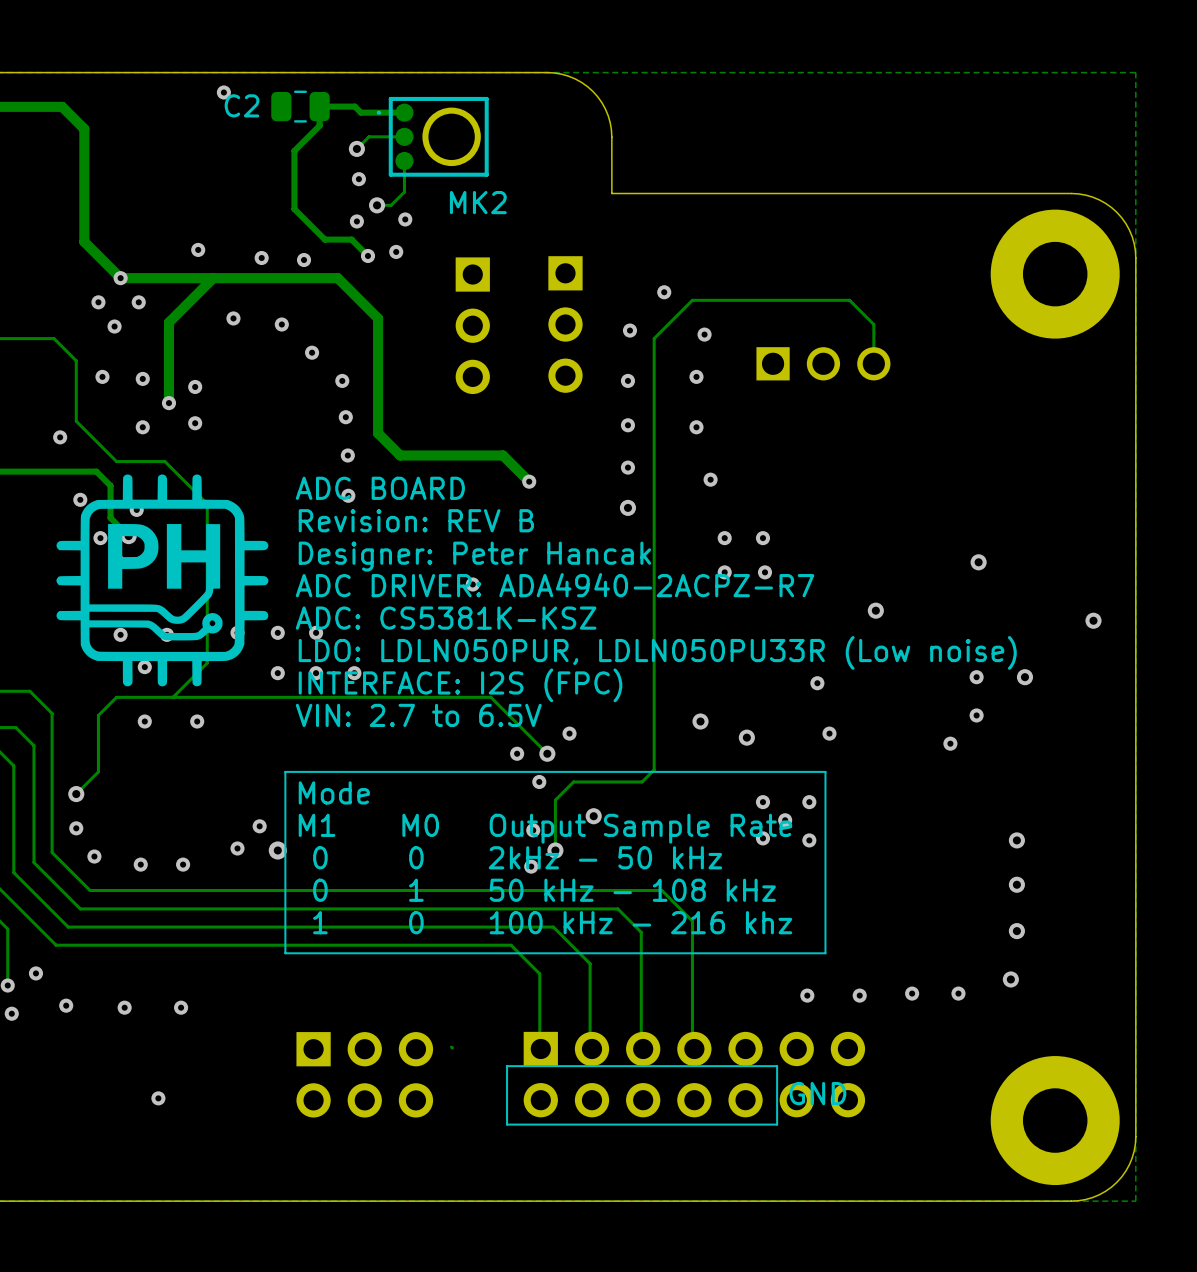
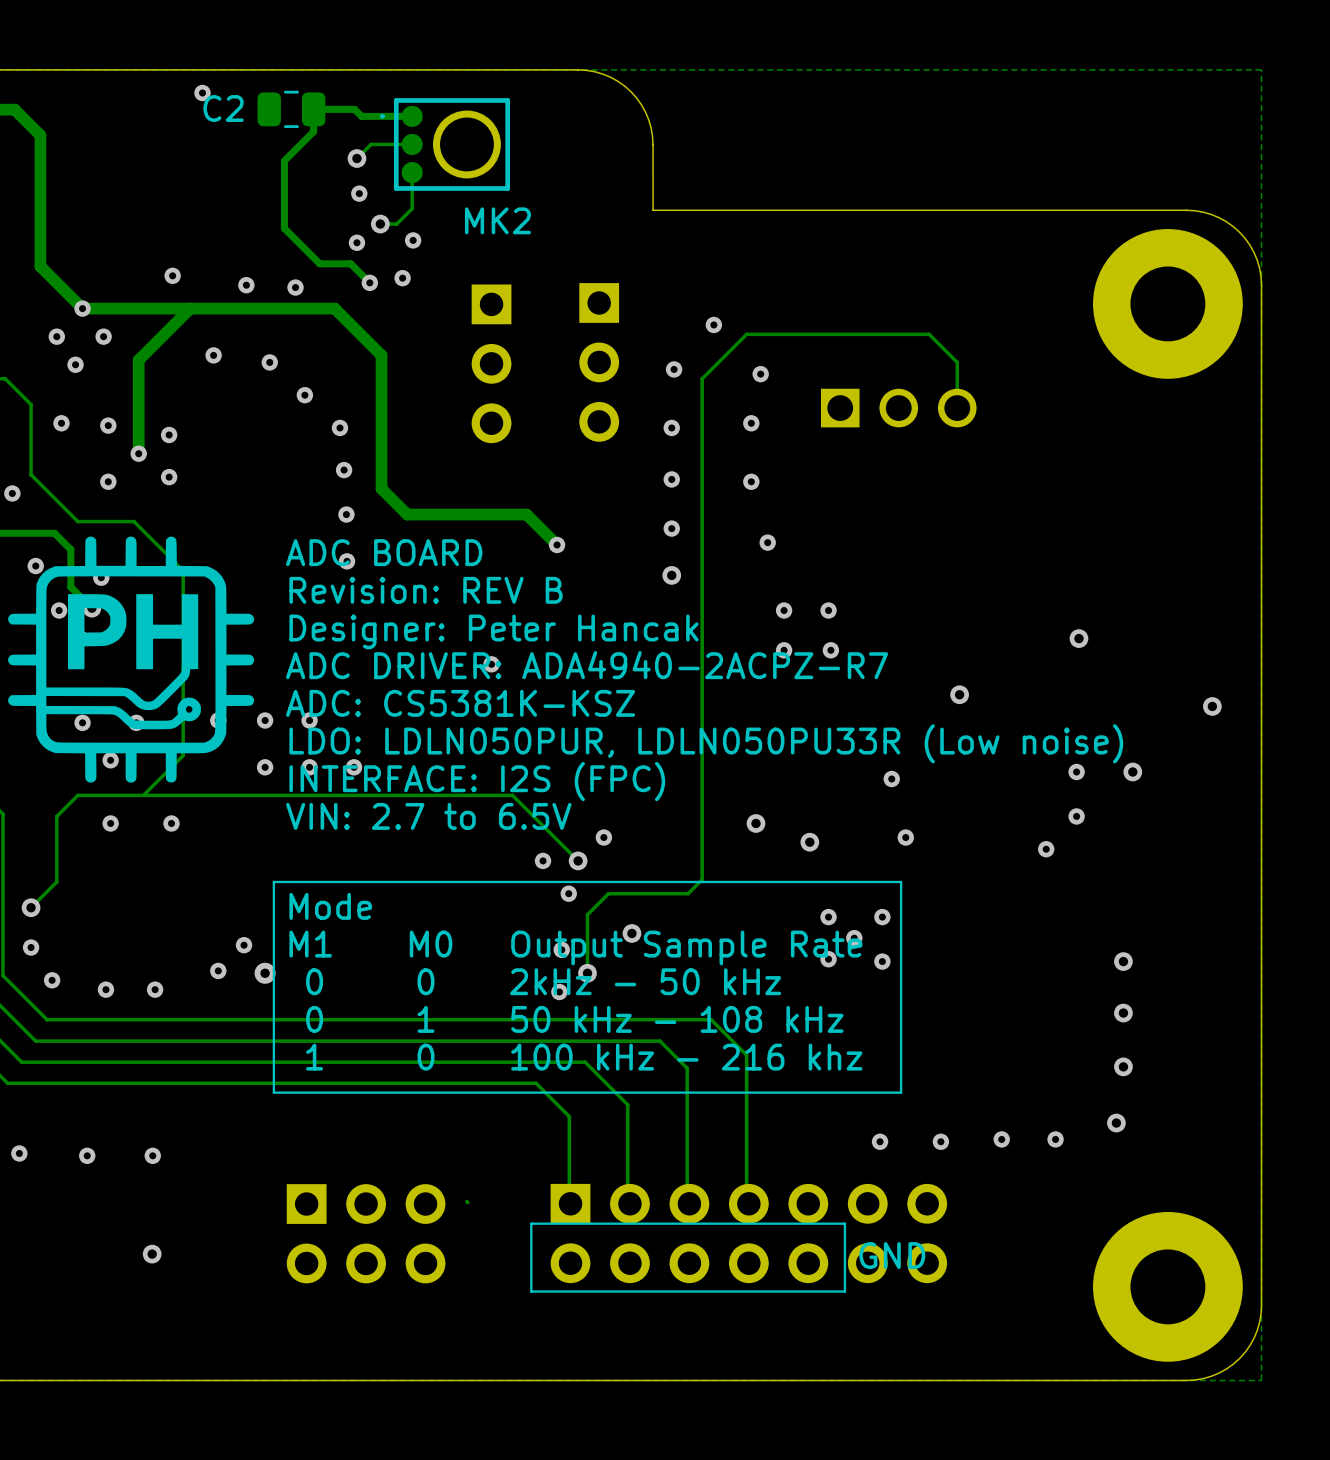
via: none -> (152, 1254)
via: (158, 1098) -> none

